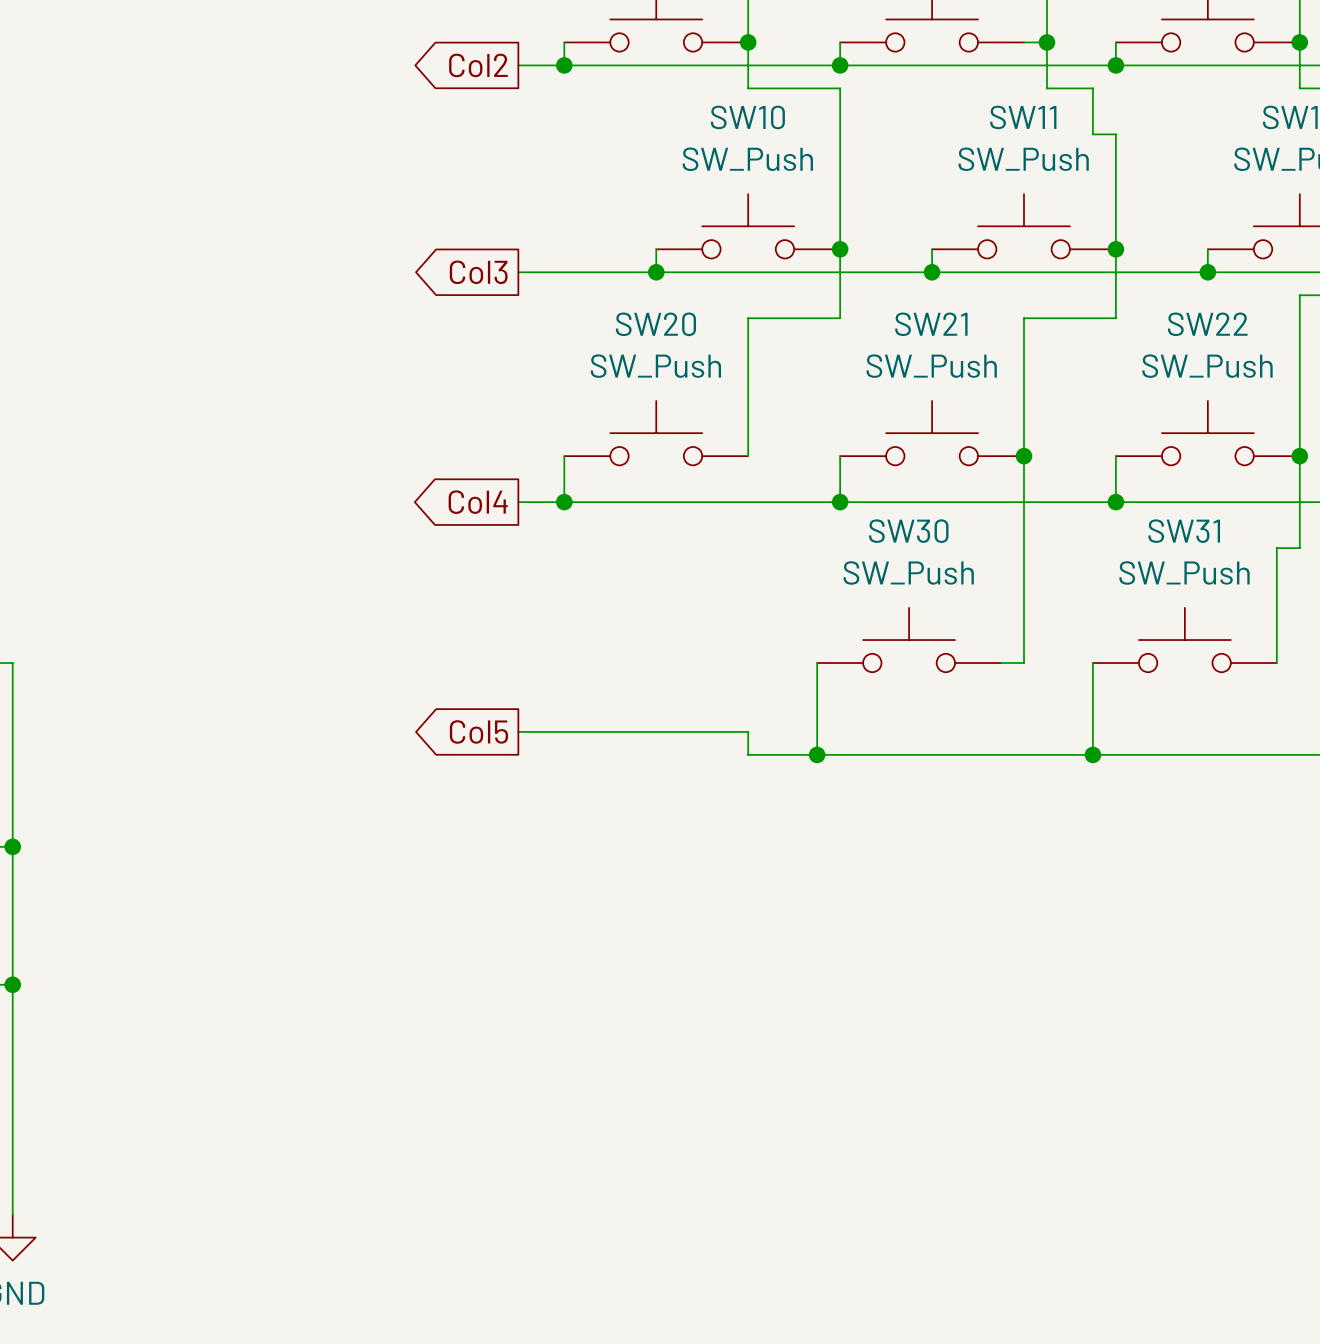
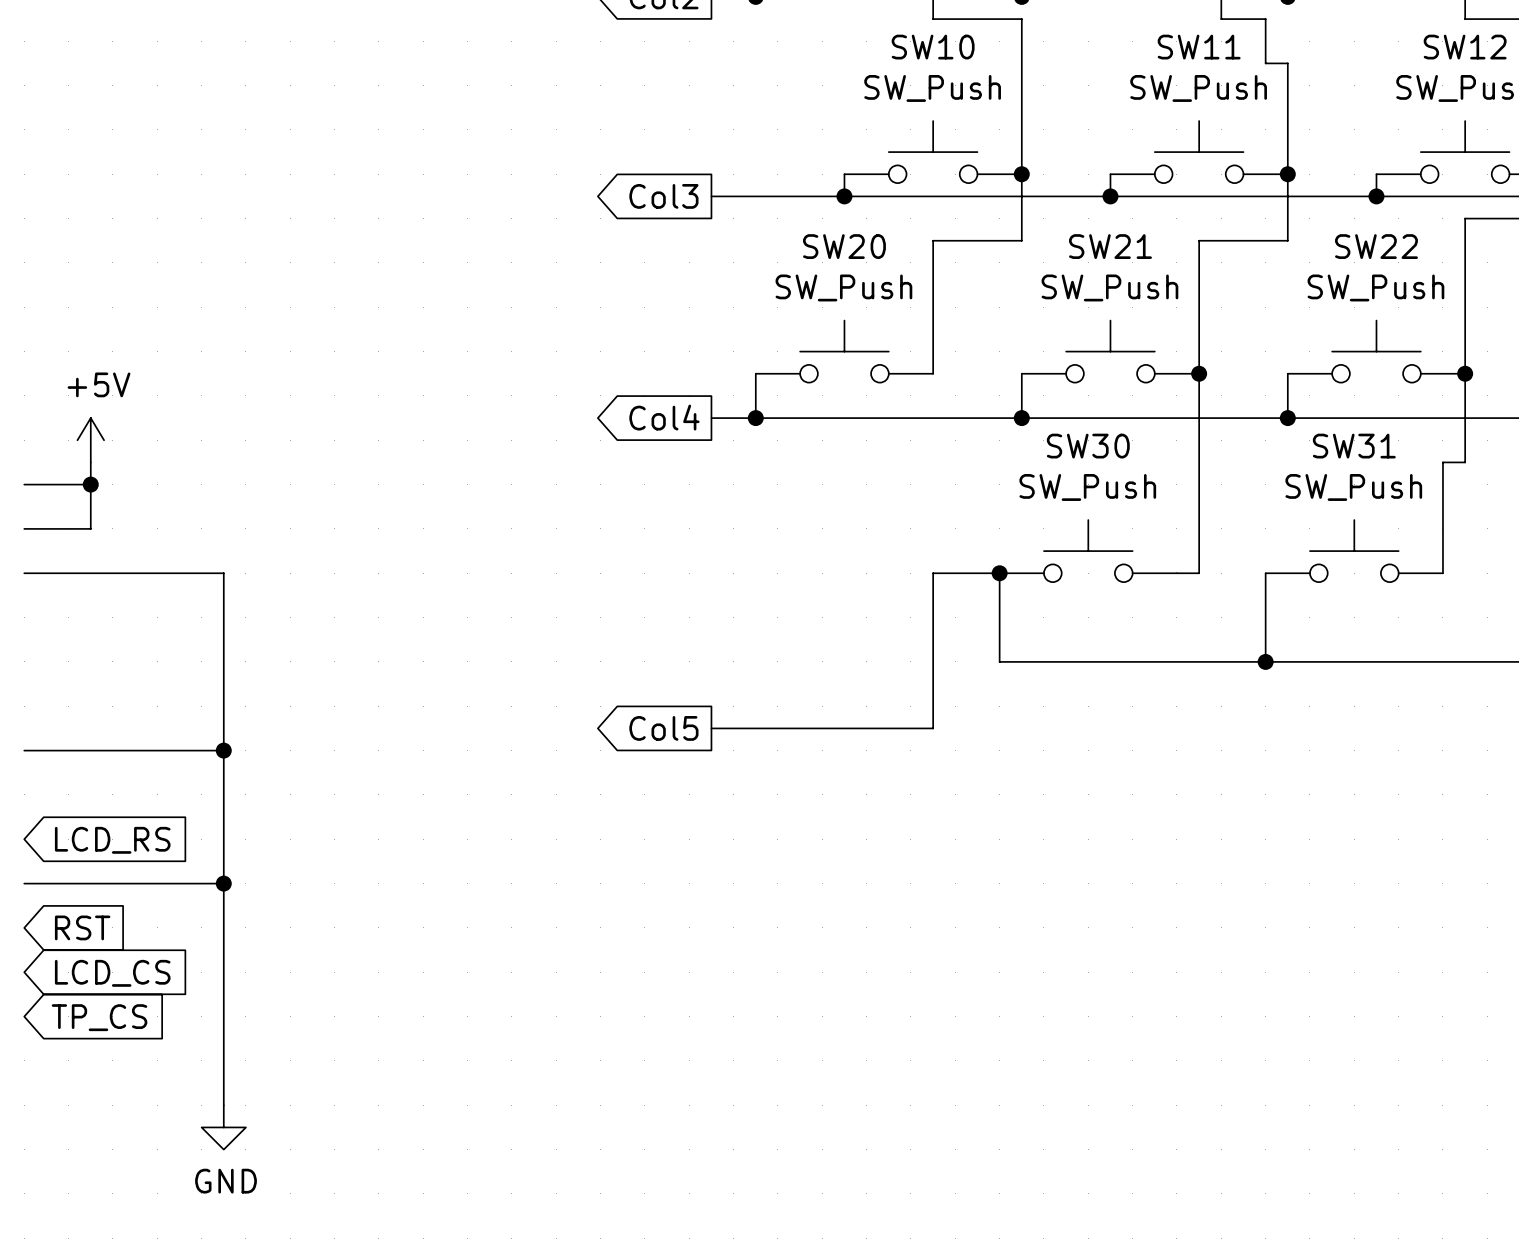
global label position: Col5 (478, 731) -> Col5 (663, 728)
wire: (518, 731) (748, 731) -> (999, 573) (933, 573) (933, 639)
wire: (748, 754) (817, 754) -> (933, 661) (933, 728) (711, 728)
junction position: (817, 754) -> (999, 573)

